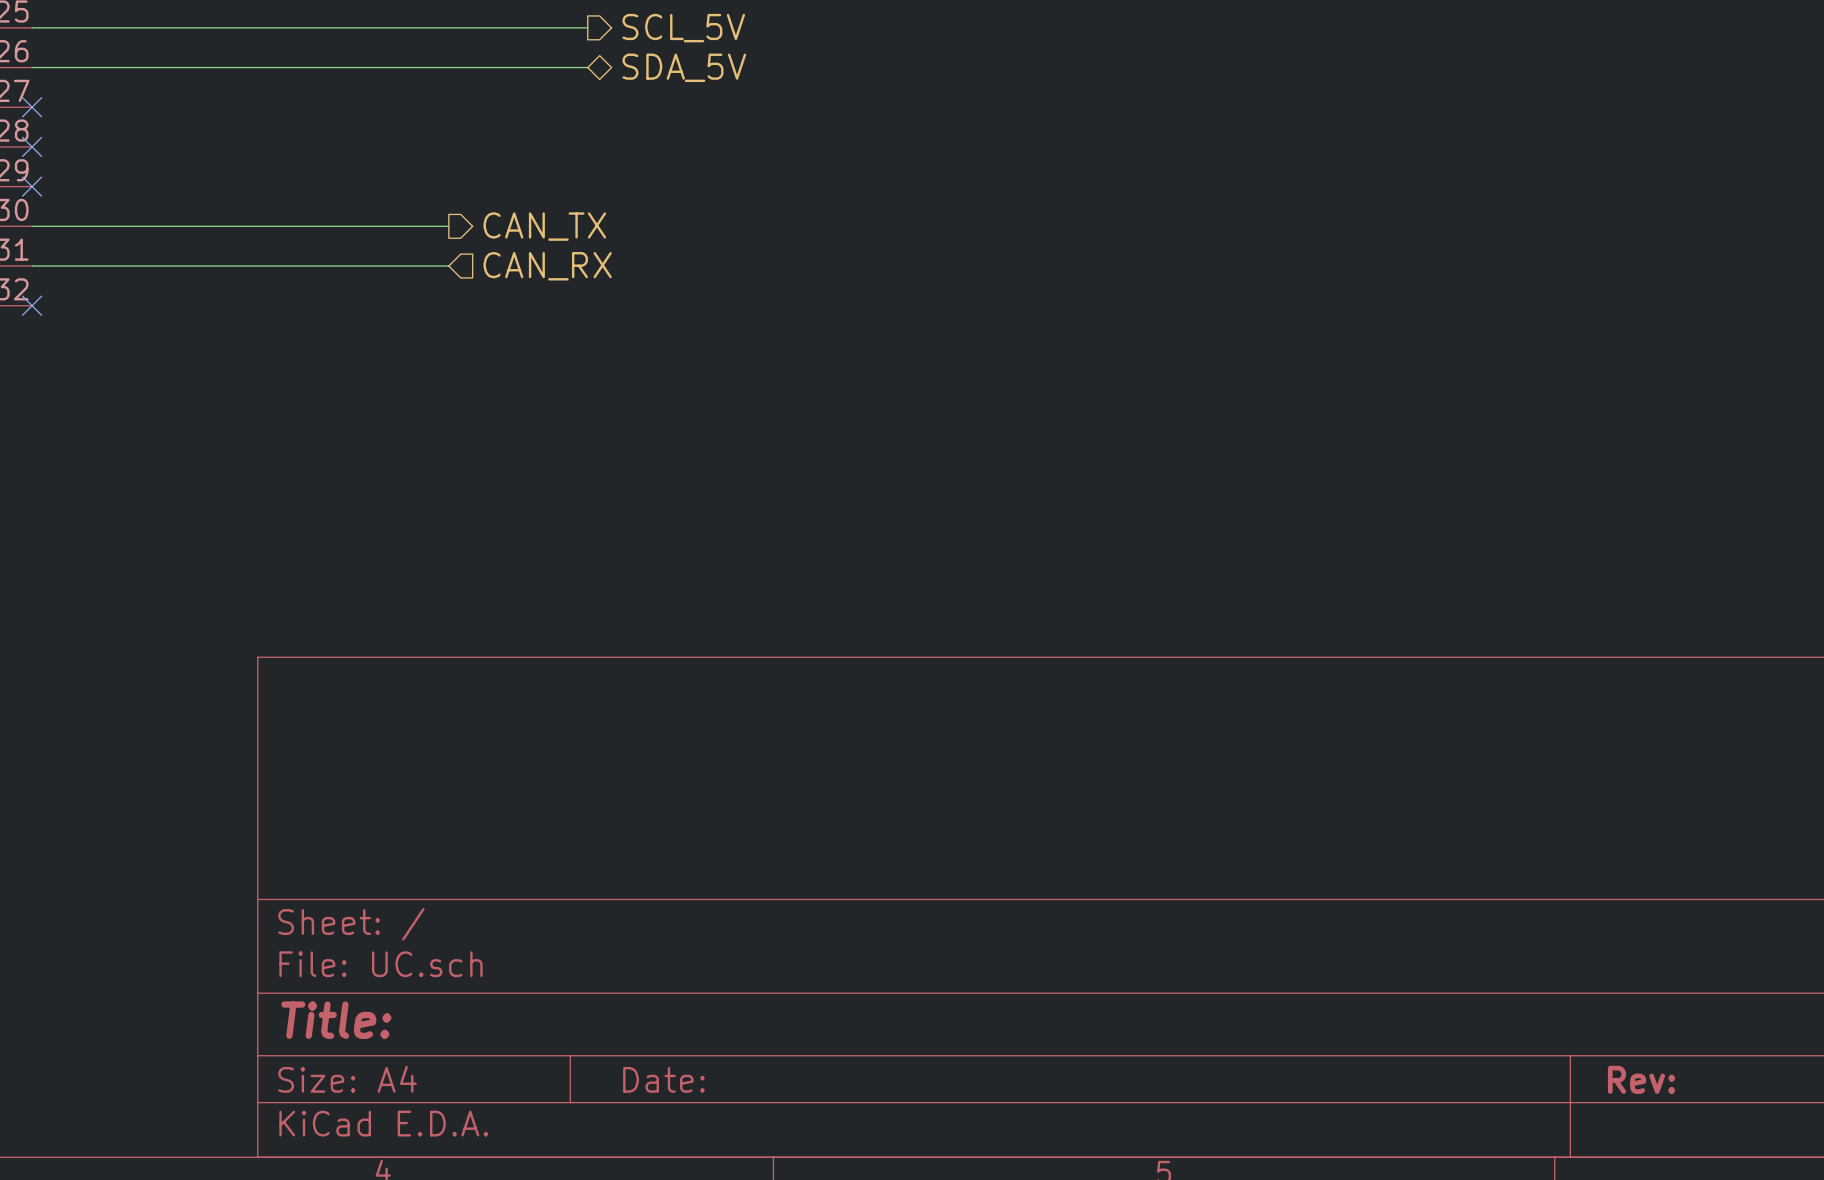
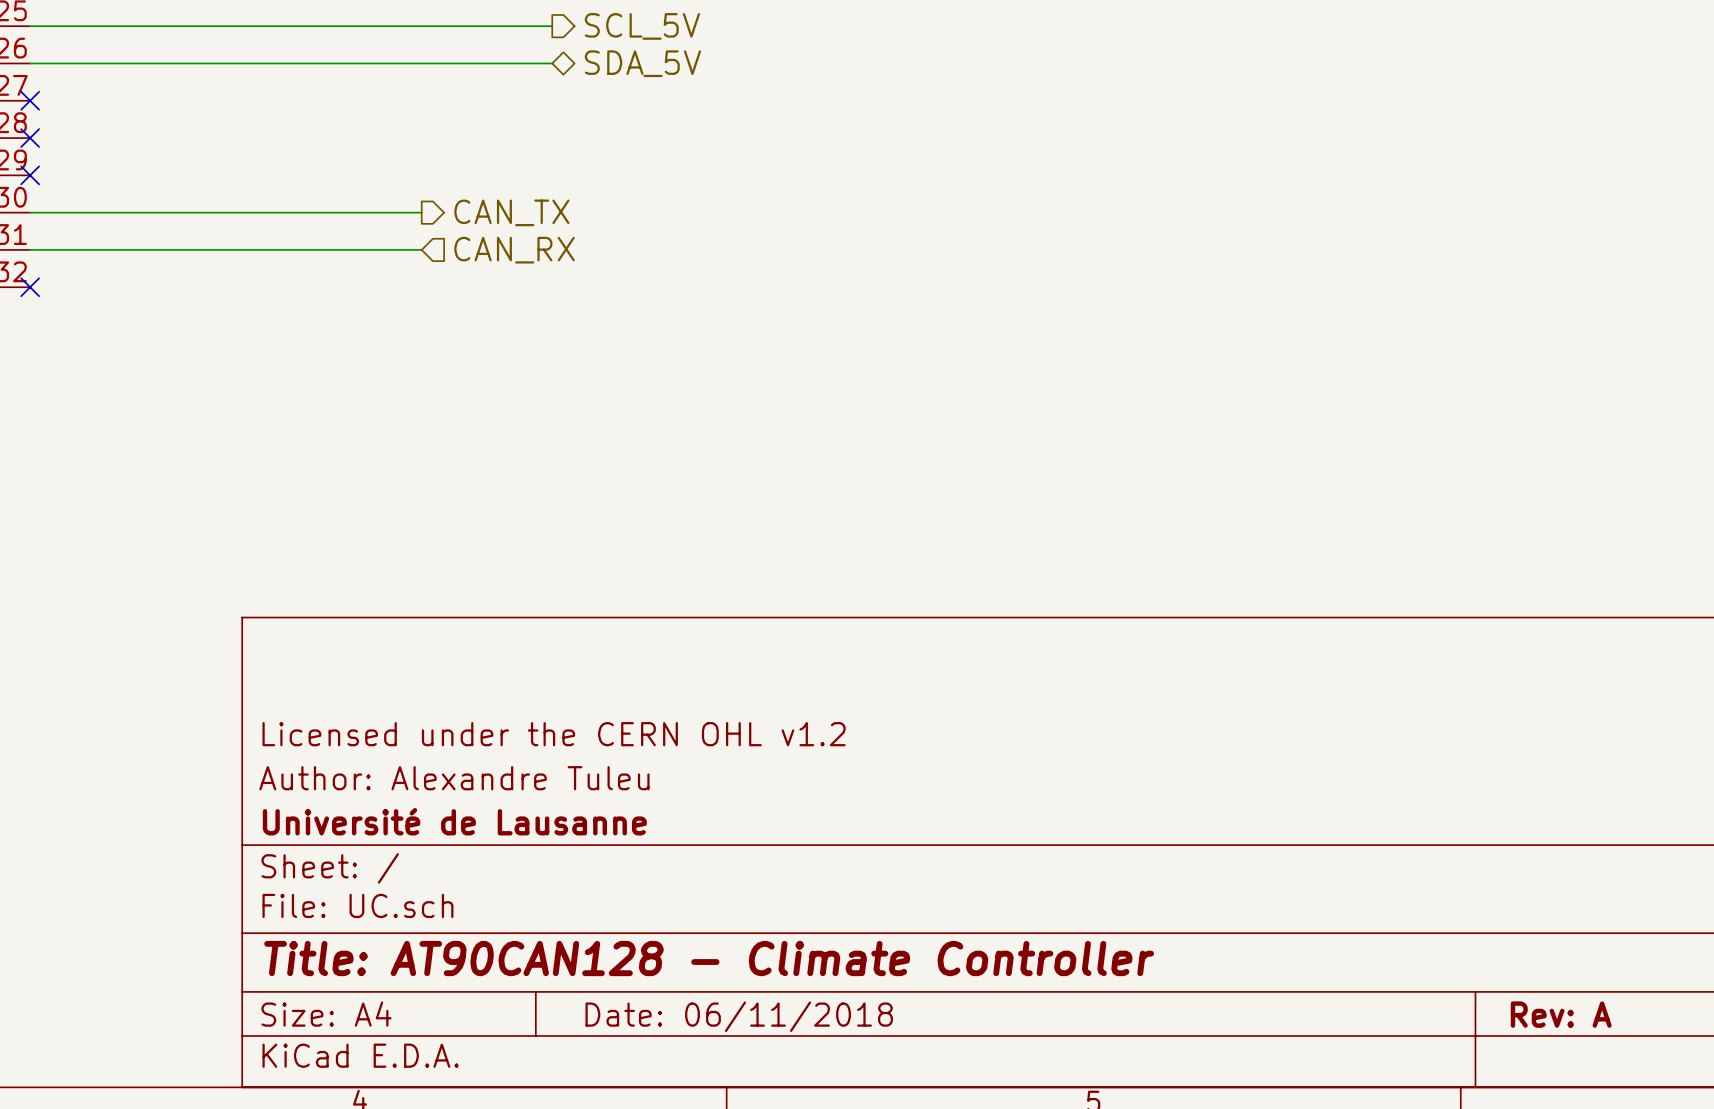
title block: none -> Licensed under the CERN OHL v1.2 (554, 734)
title block: none -> Author: Alexandre Tuleu (454, 778)
title block: none -> Université de Lausanne (454, 821)
title block: Title: (336, 1020) -> Title: AT90CAN128 - Climate Controller (709, 958)
title block: Date: (663, 1079) -> Date: 06/11/2018 (739, 1016)
title block: Rev: (1641, 1079) -> Rev: A (1561, 1014)

